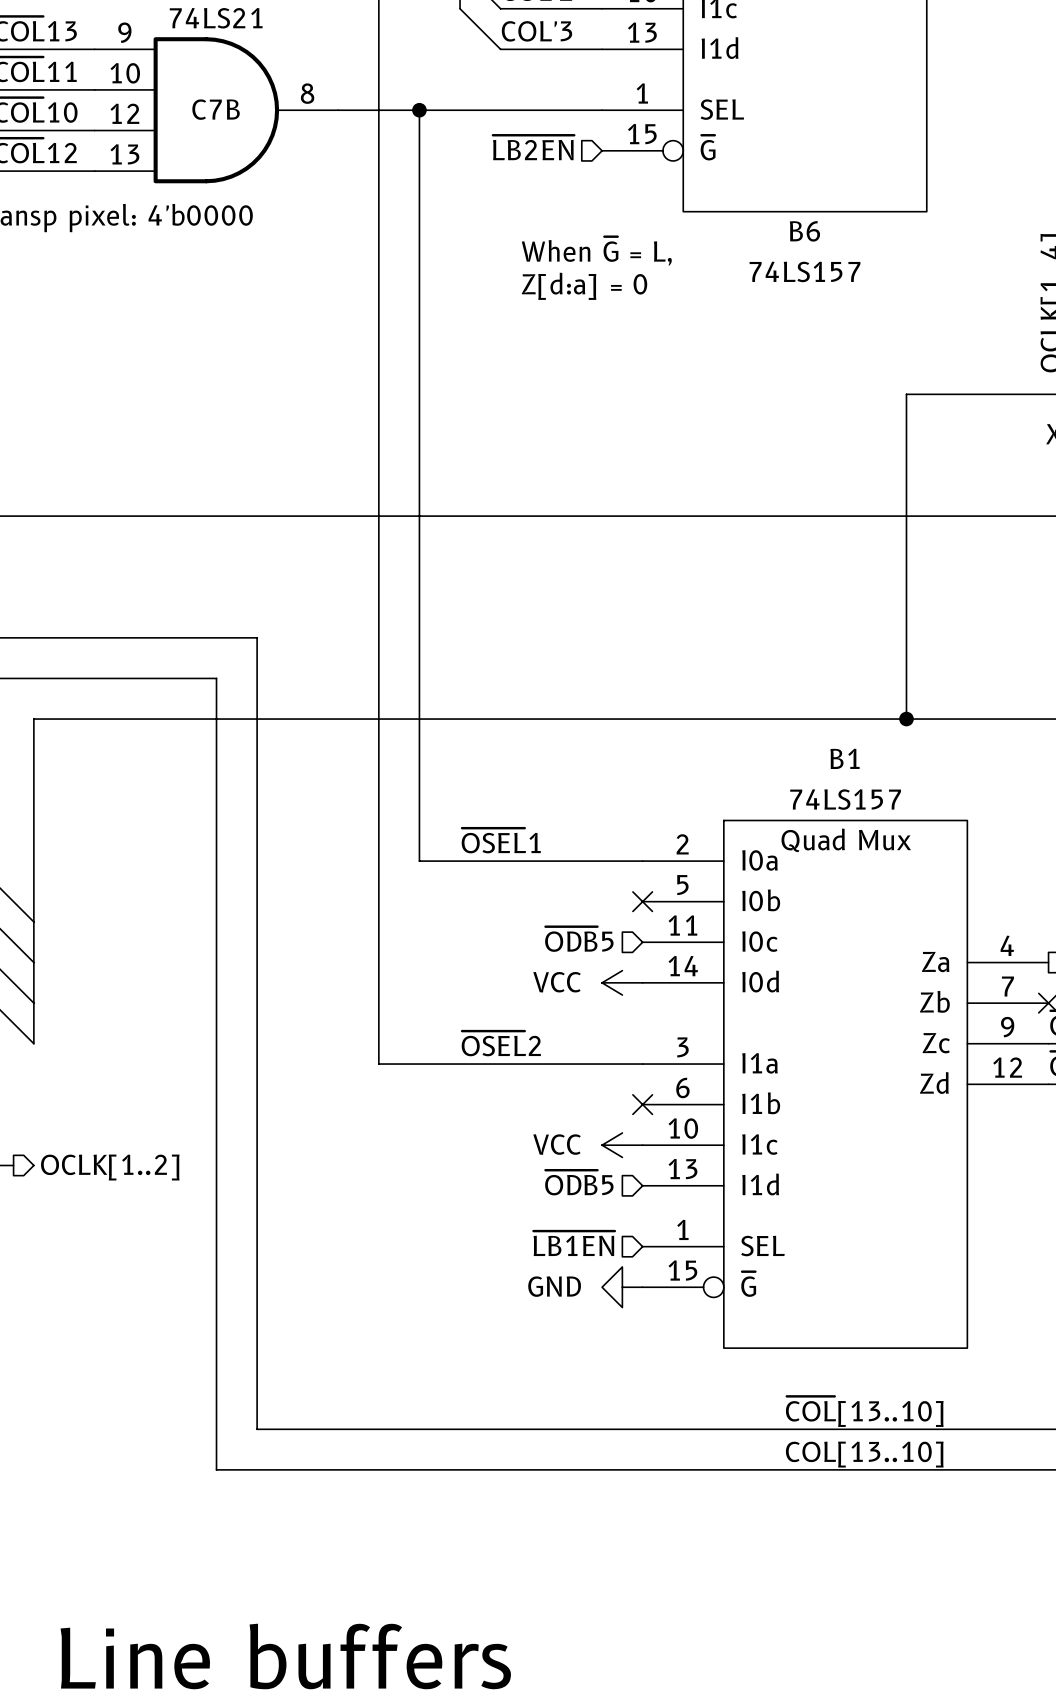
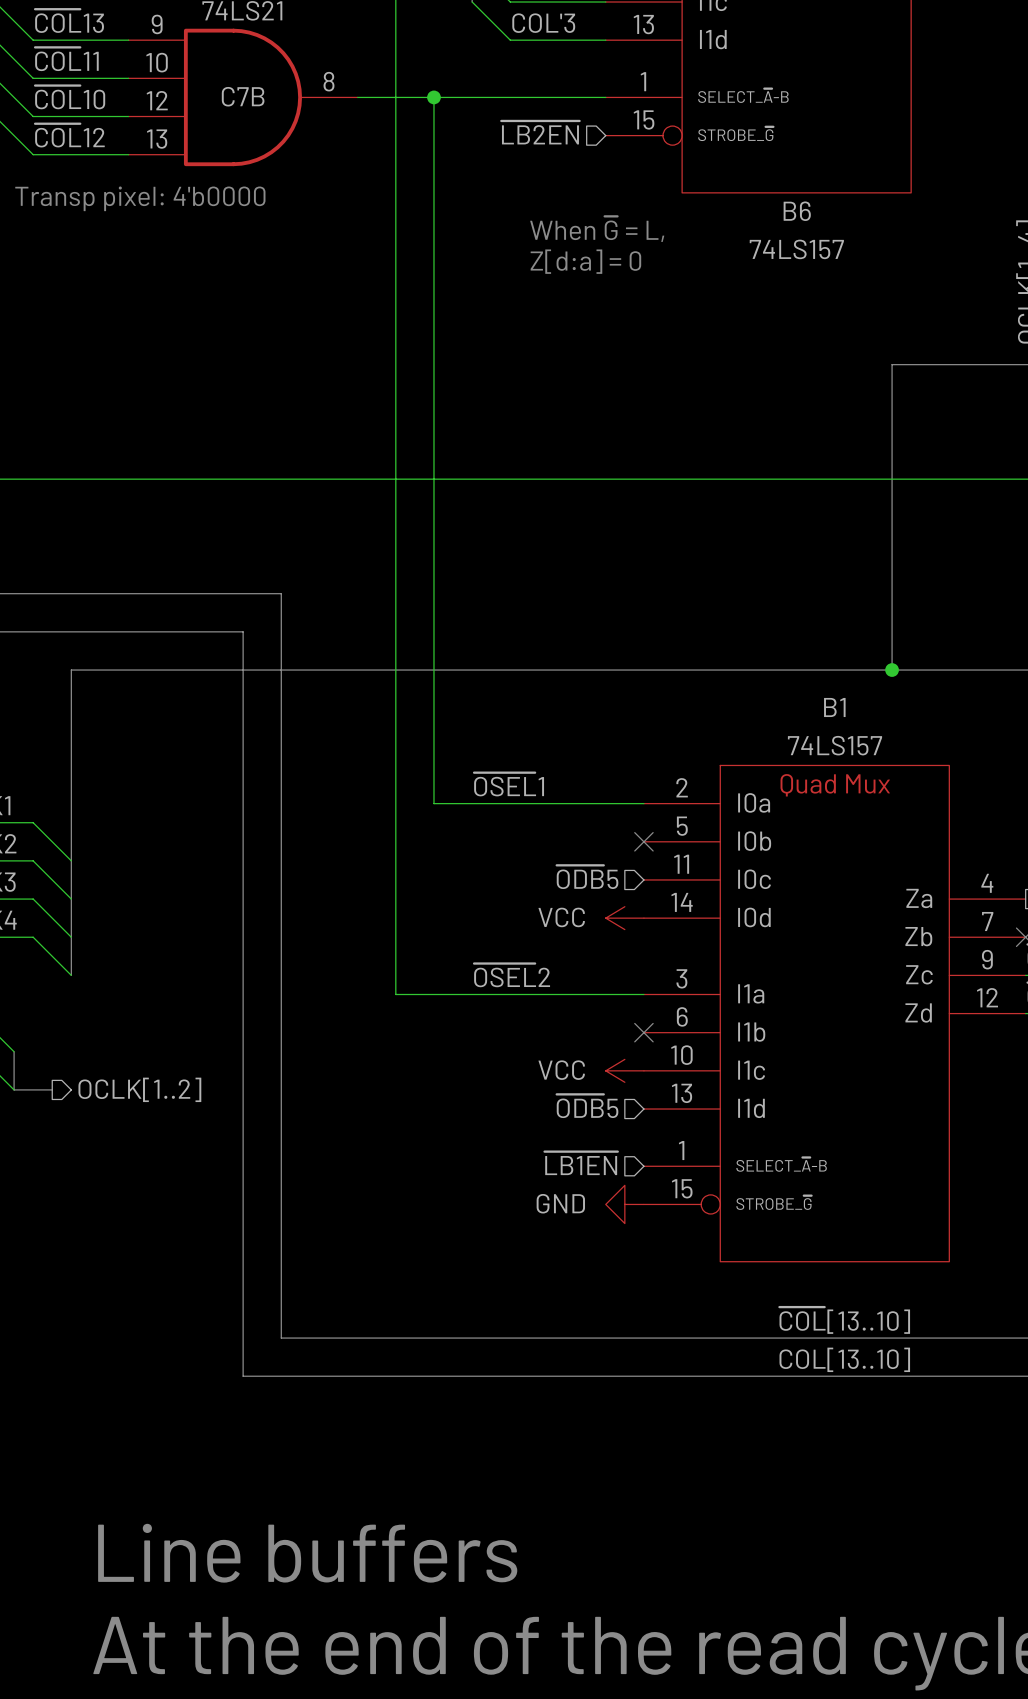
B6 pin name: SEL (722, 109) -> SELECT_~{A}-B (743, 95)
B6 pin name: ~{G} (708, 147) -> STROBE_~{G} (735, 133)
B1 pin name: SEL (762, 1246) -> SELECT_~{A}-B (781, 1164)
B1 pin name: ~{G} (748, 1284) -> STROBE_~{G} (773, 1202)

